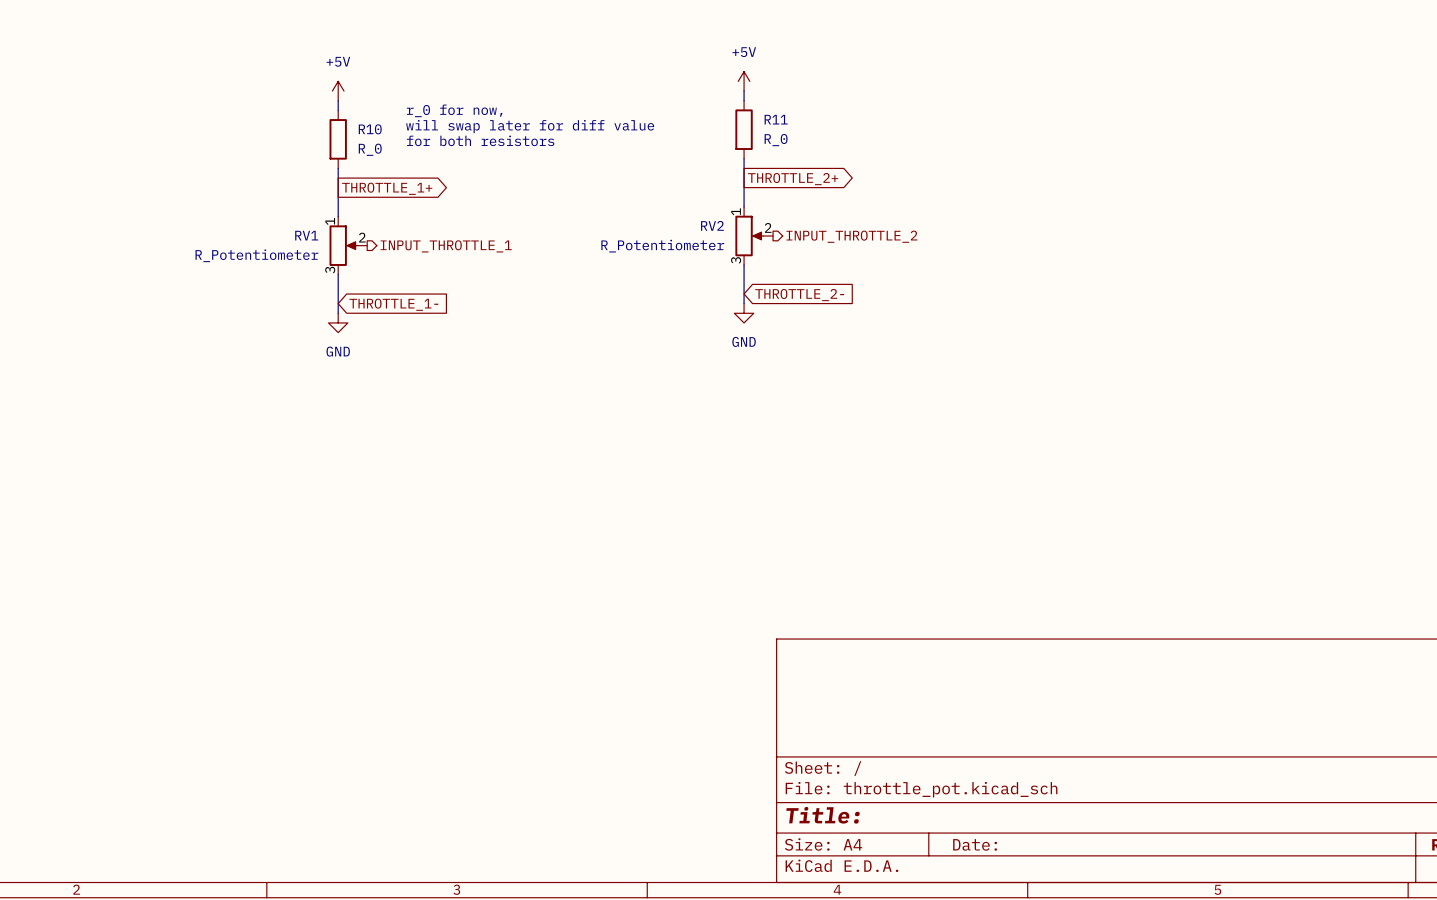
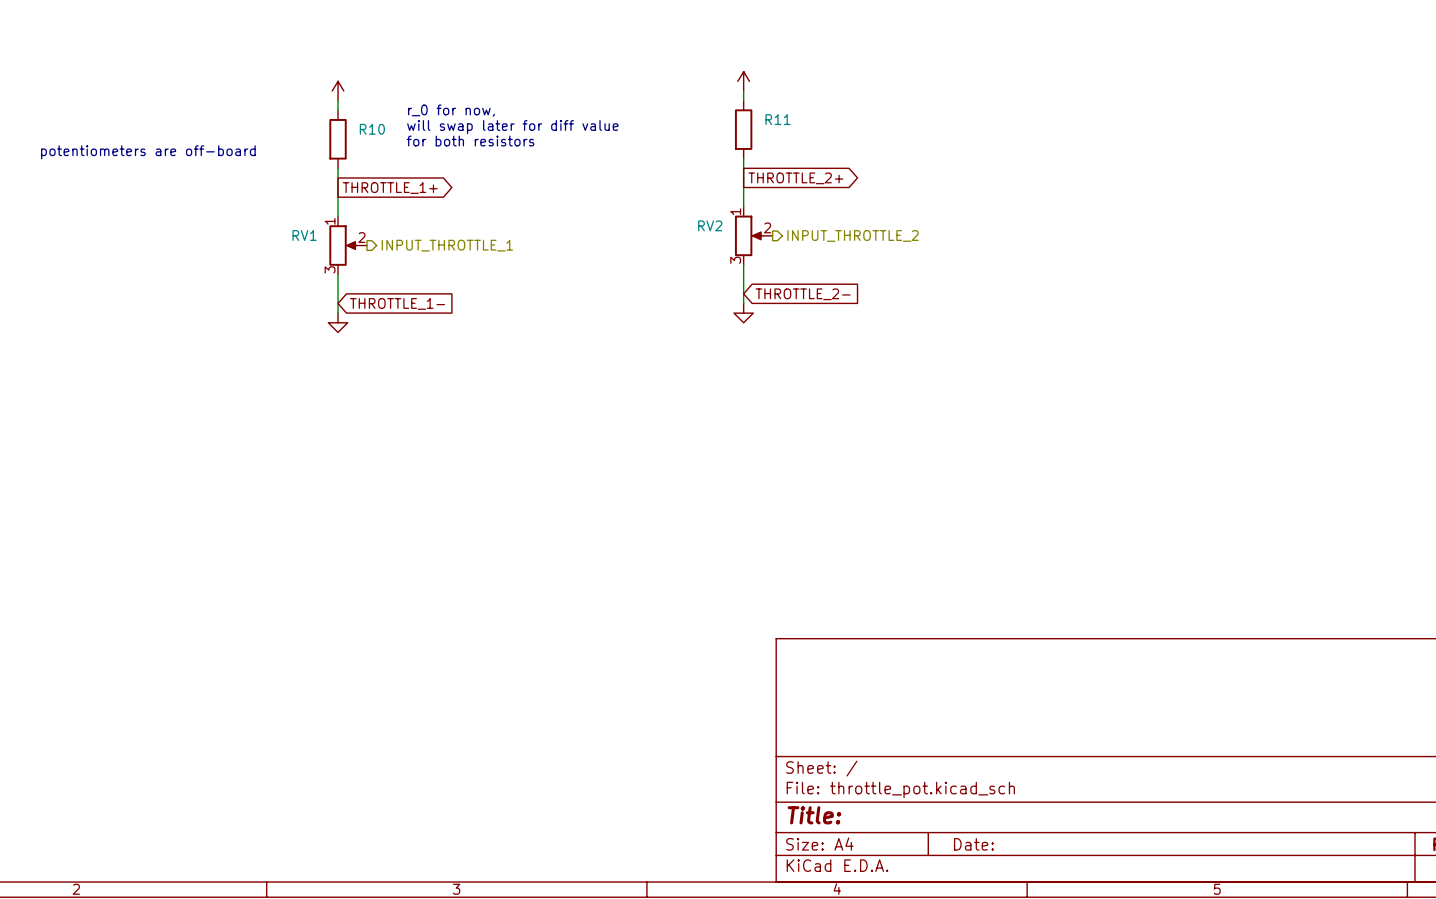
power symbol text: +5V (744, 52) -> none
power symbol text: +5V (338, 61) -> none
R11 value: R_0 (776, 140) -> none
R10 value: R_0 (370, 149) -> none
text: none -> potentiometers are off-board (148, 152)
RV2 value: R_Potentiometer (662, 246) -> none
RV1 value: R_Potentiometer (256, 255) -> none
power symbol text: GND (744, 341) -> none
power symbol text: GND (338, 351) -> none

